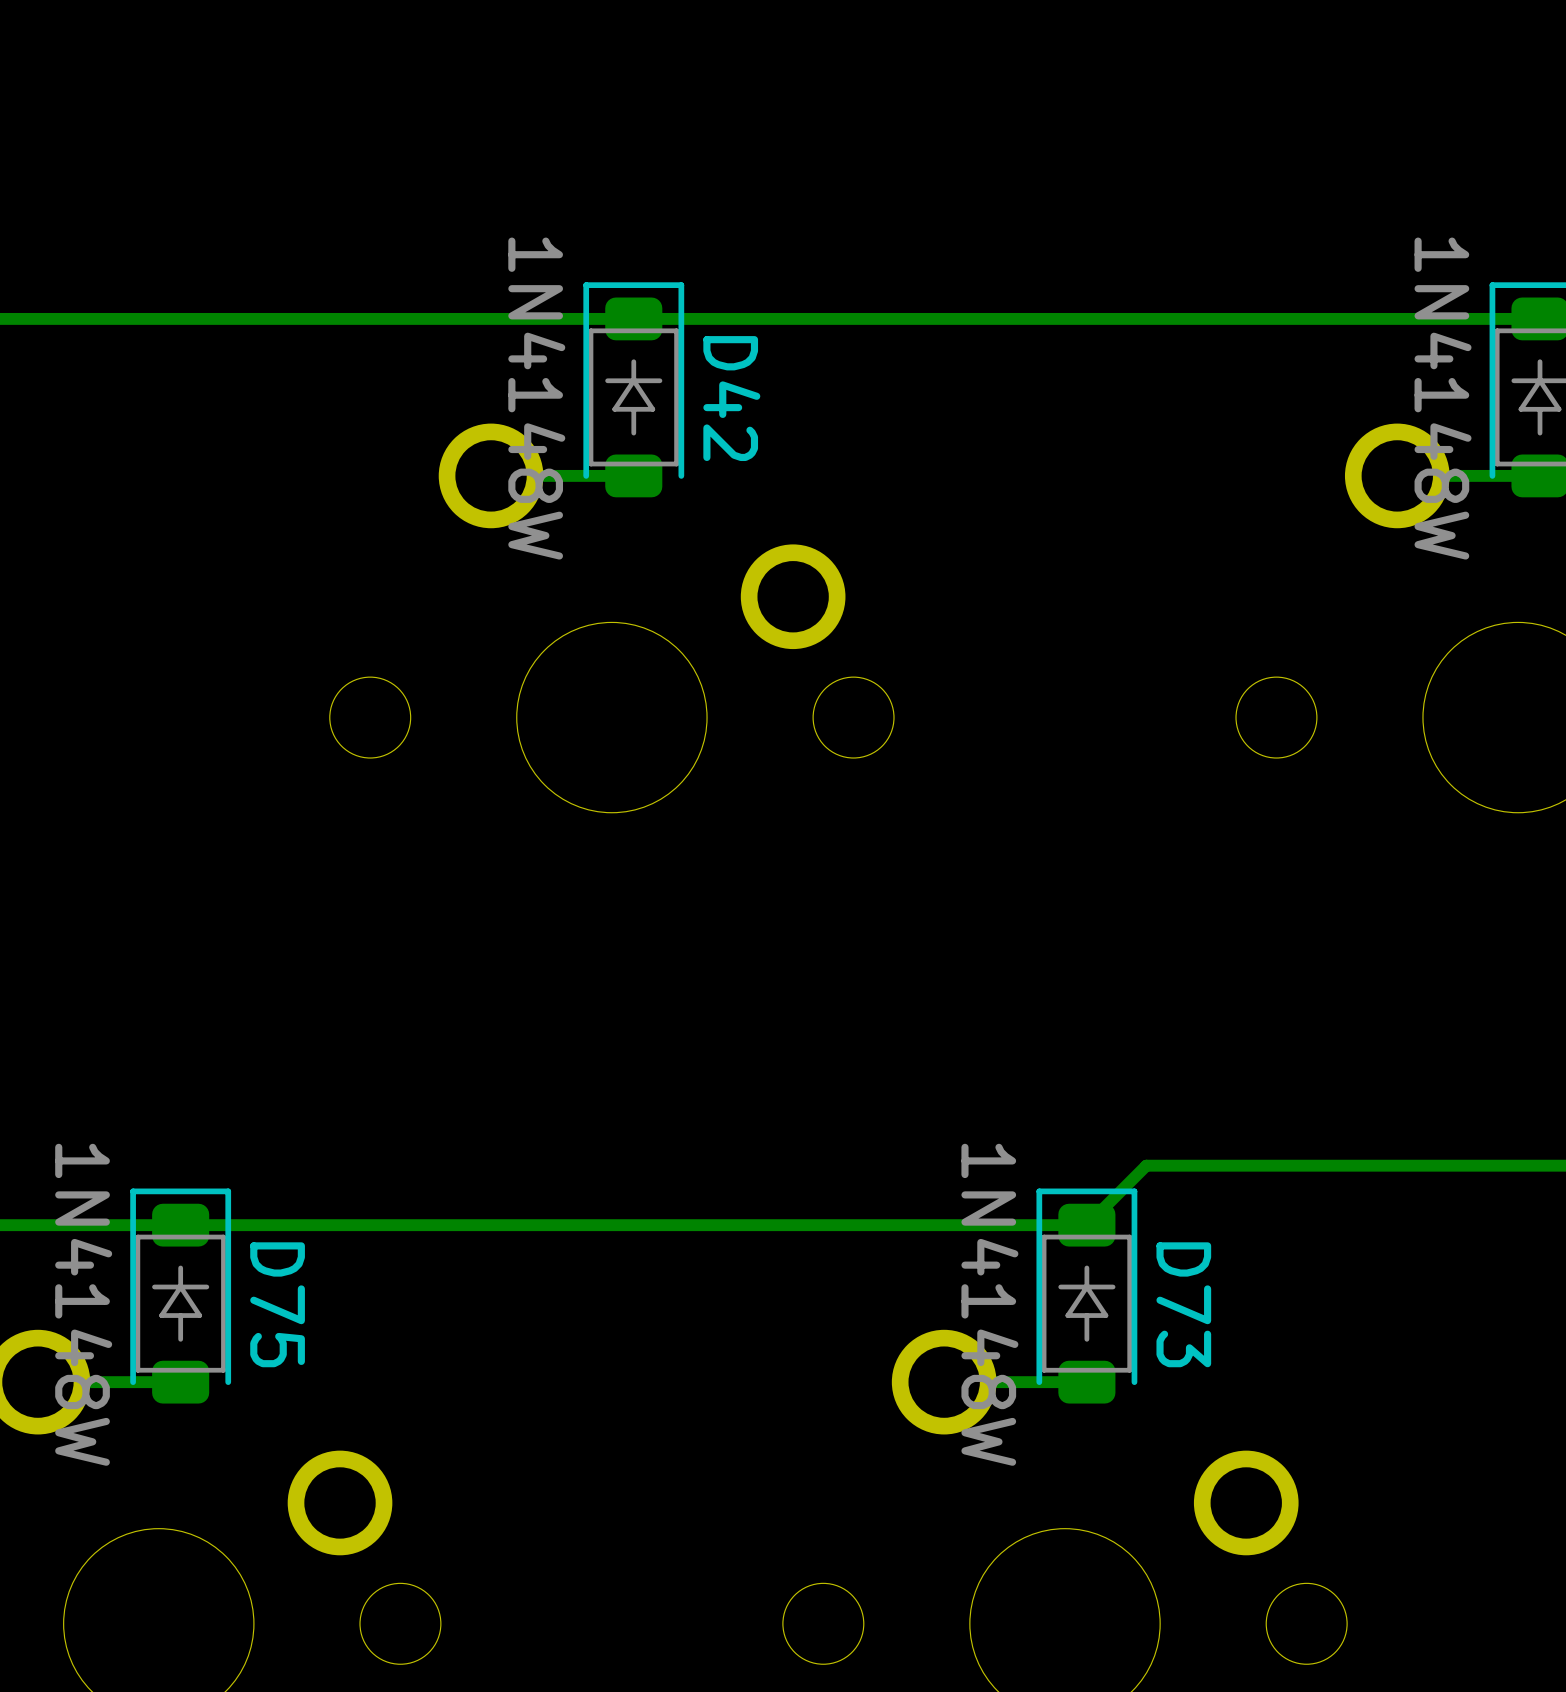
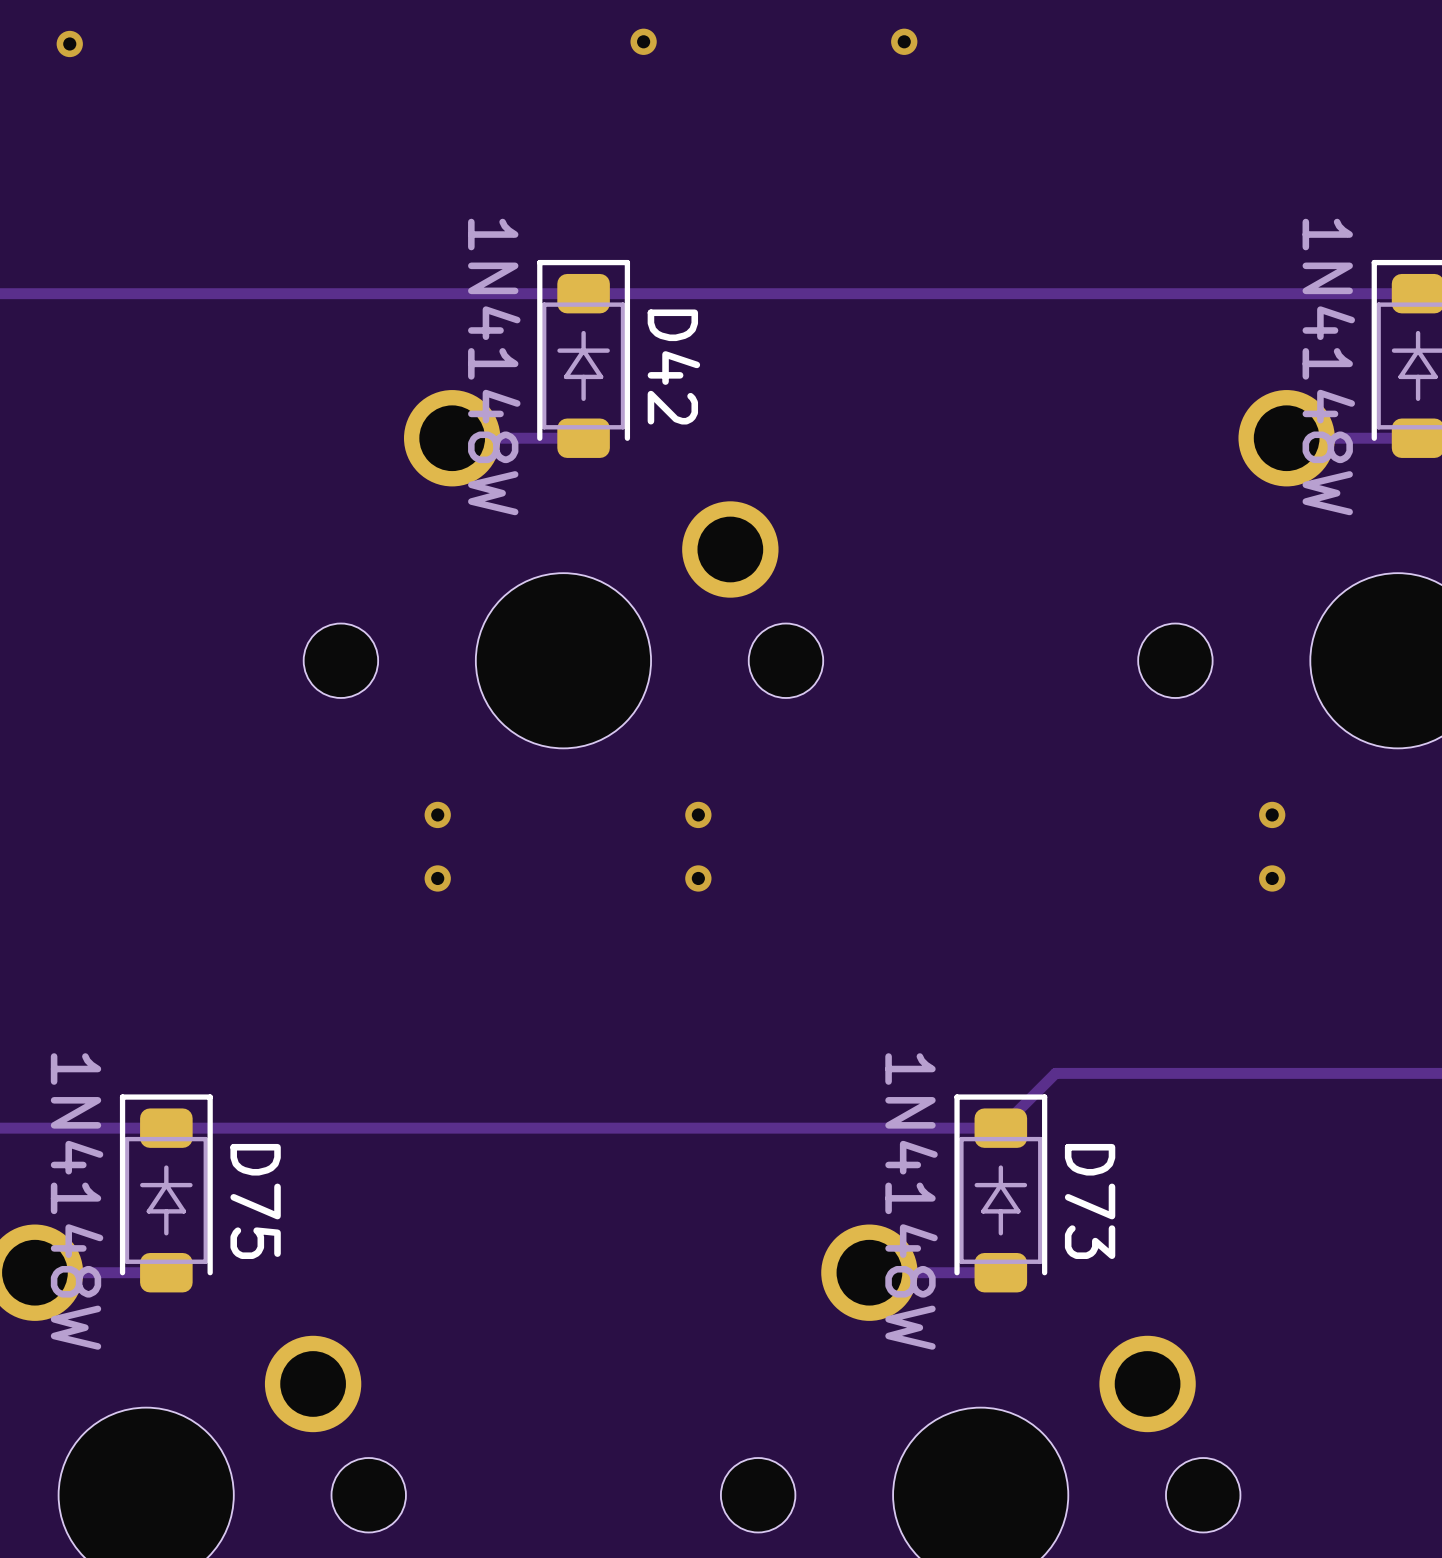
via: none -> (643, 41)
via: none -> (904, 41)
via: none -> (69, 43)
via: none -> (437, 814)
via: none -> (698, 814)
via: none -> (1272, 814)
via: none -> (437, 878)
via: none -> (698, 878)
via: none -> (1272, 878)

